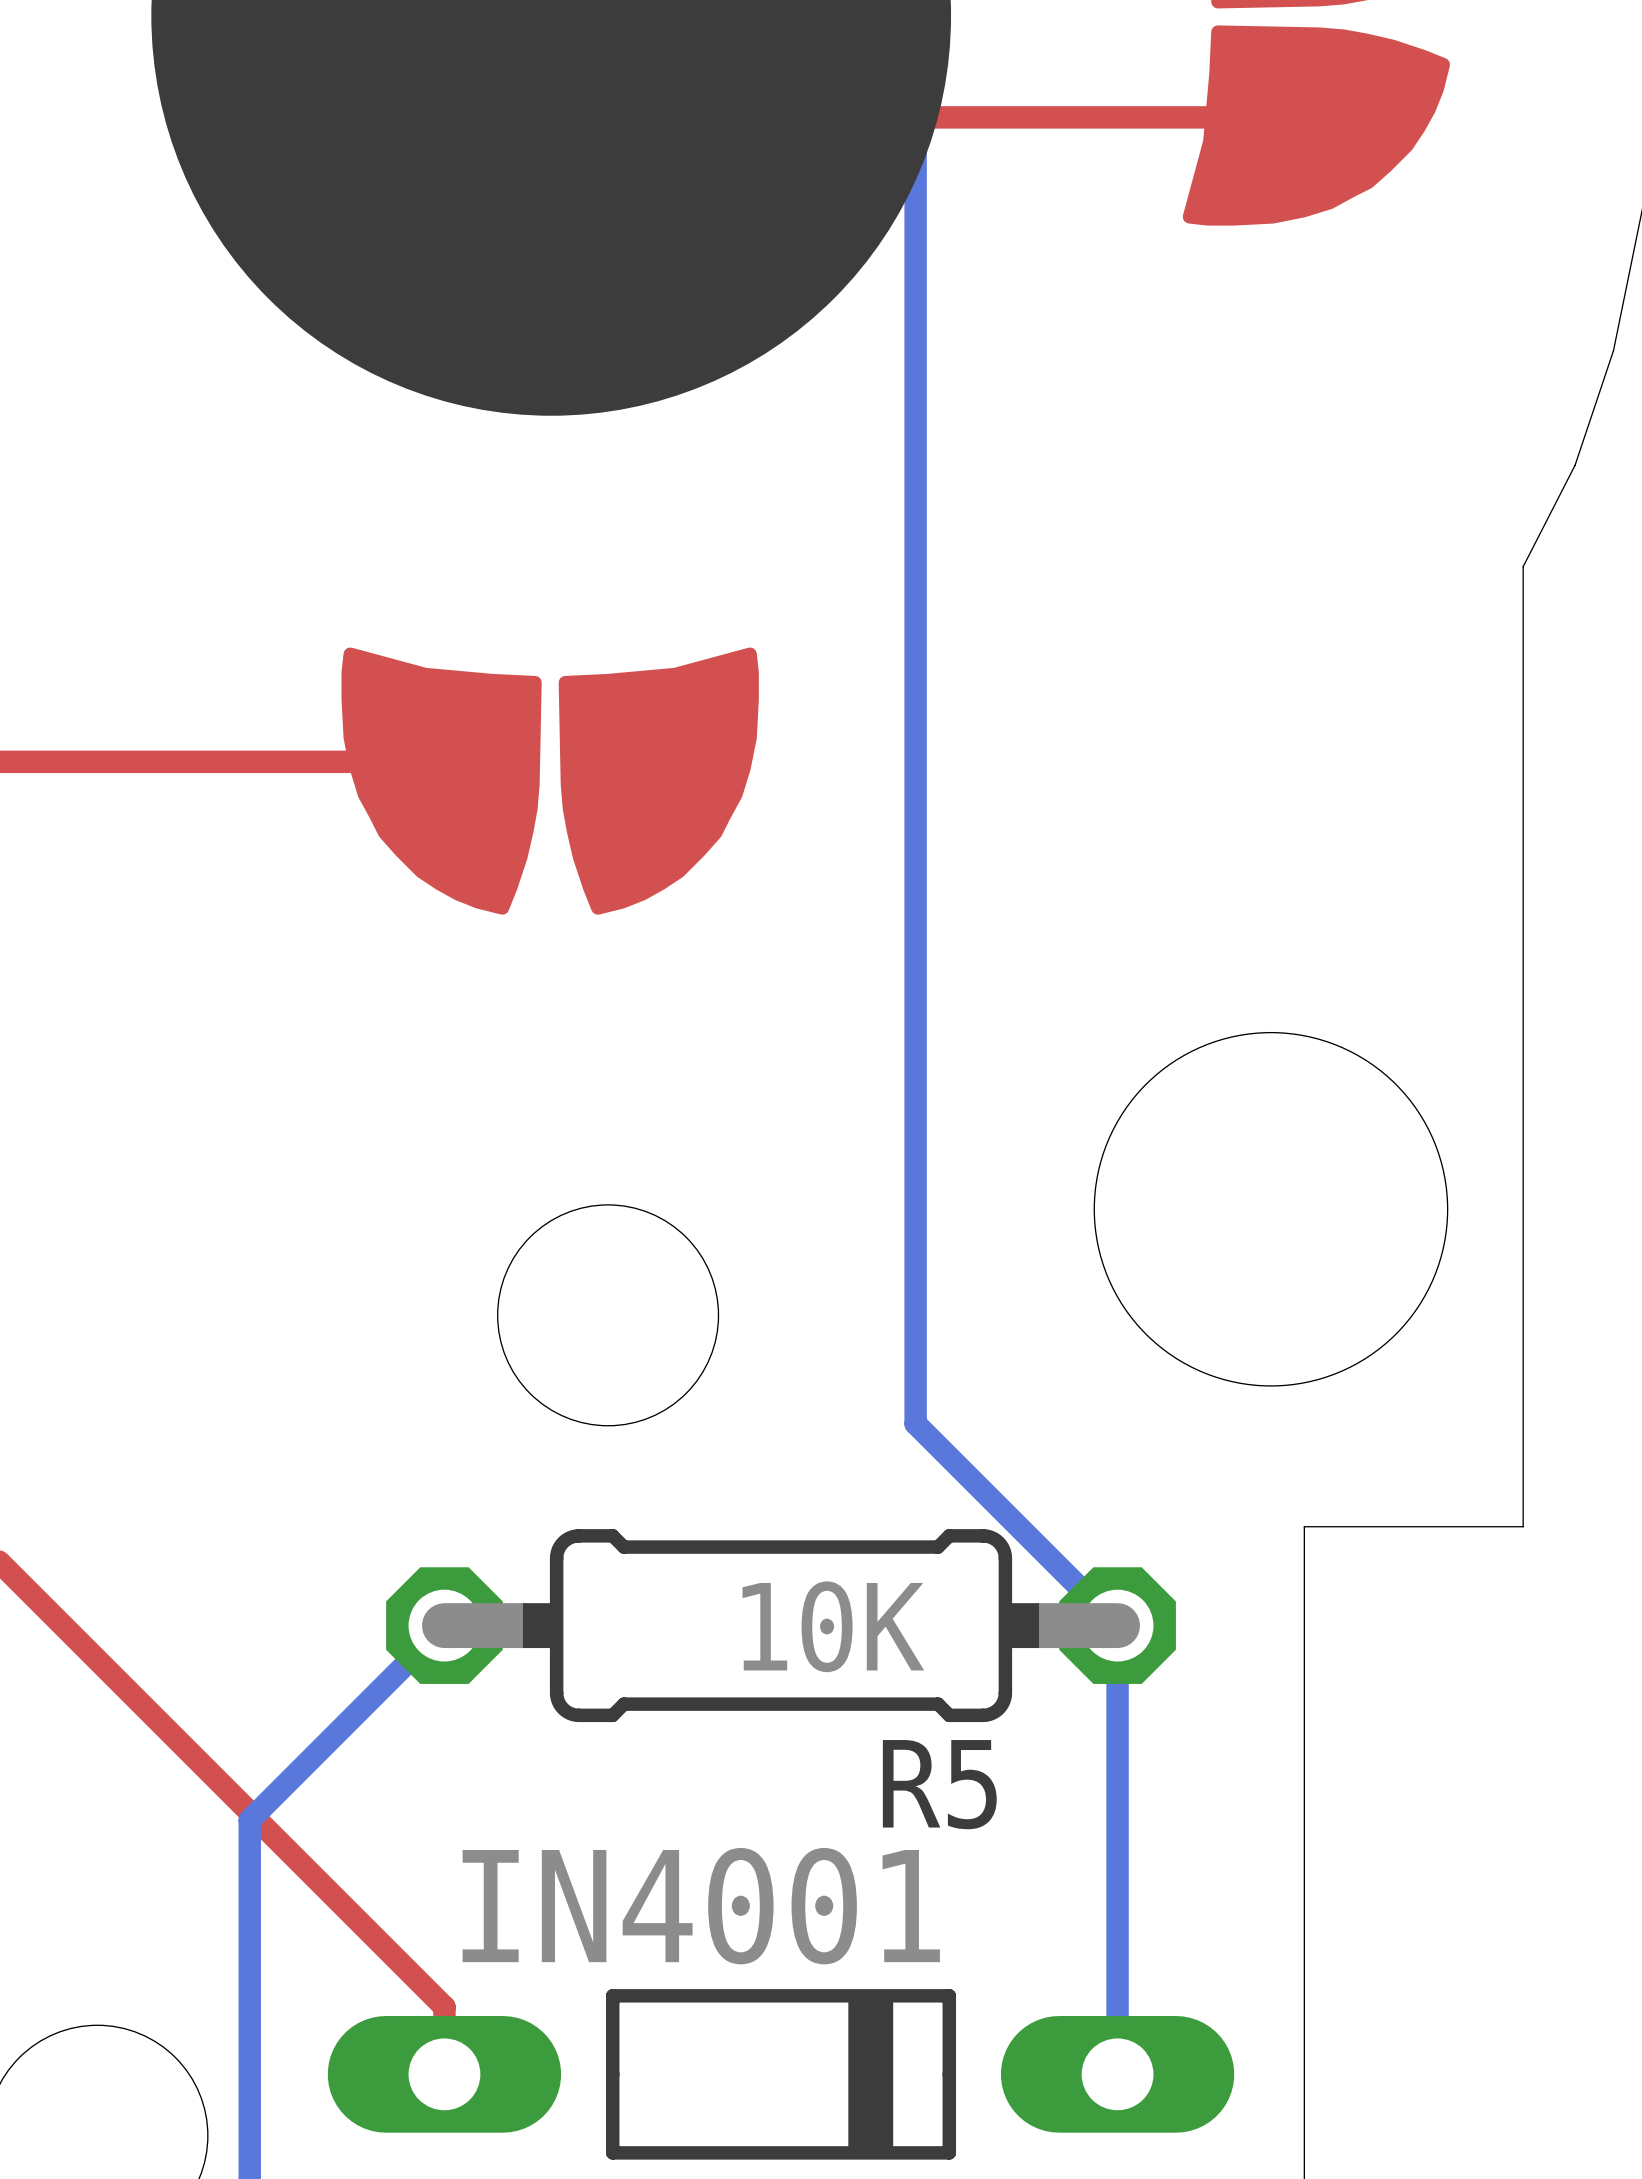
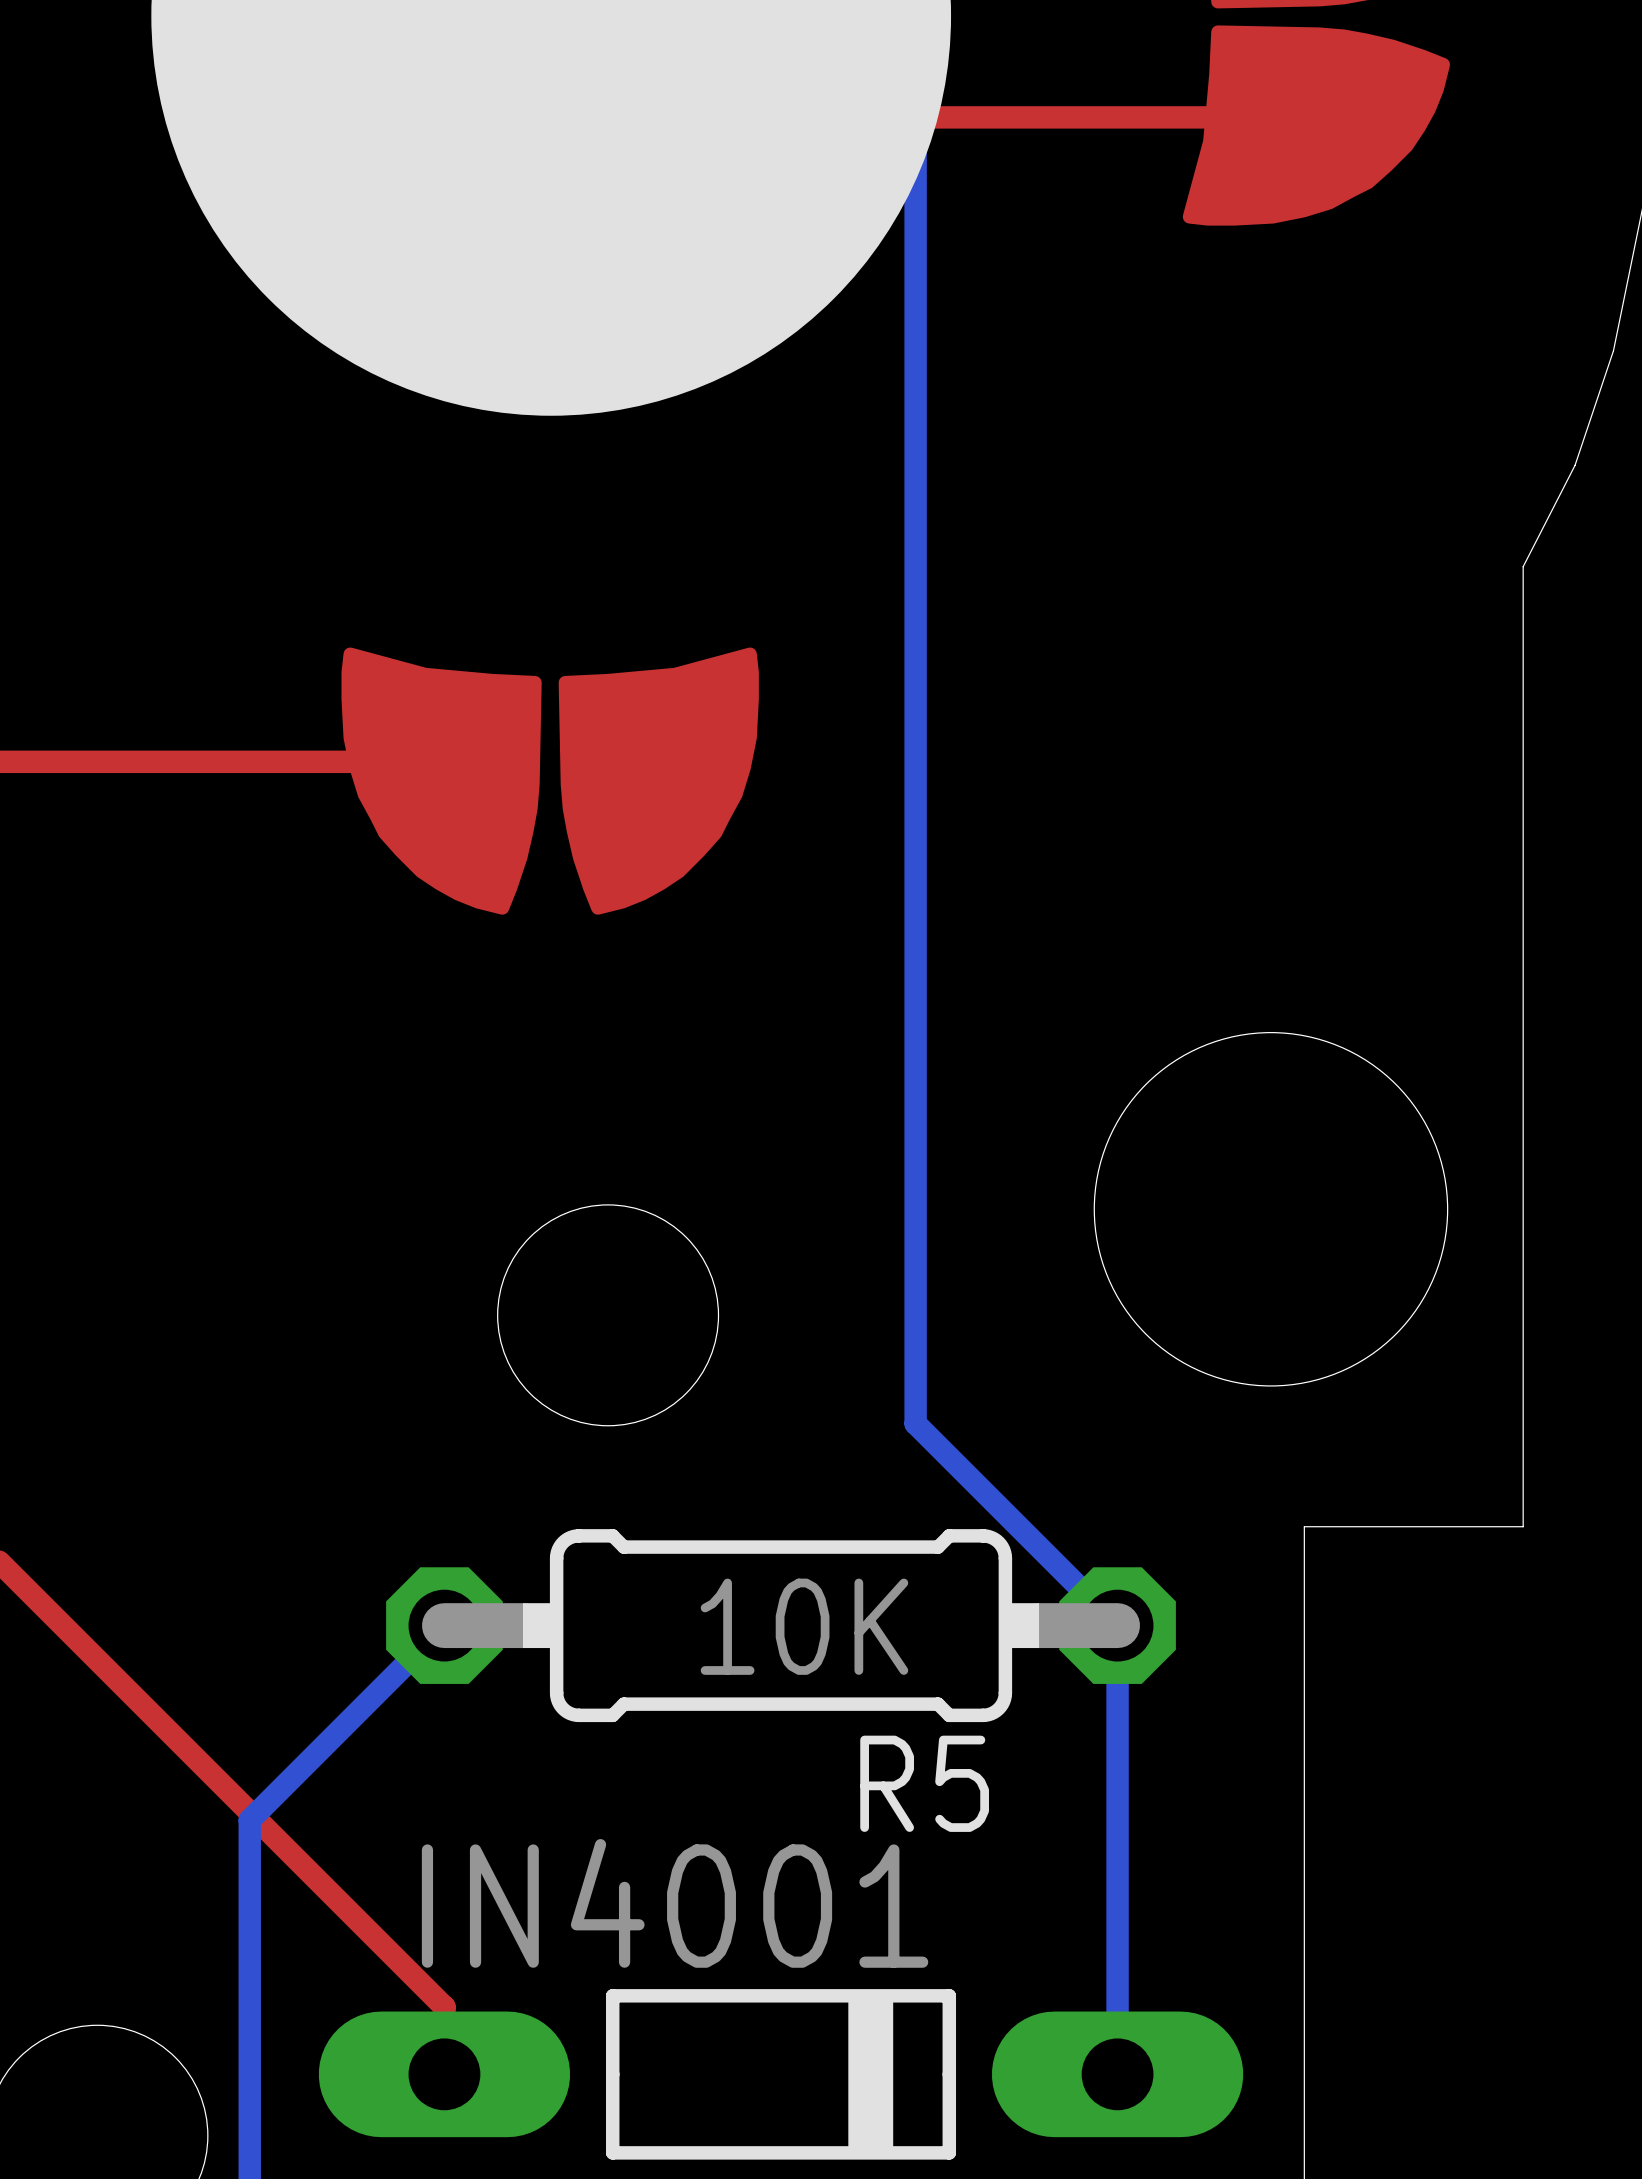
part footprint: [327, 1989, 1235, 2160] -> [318, 1989, 1244, 2160]

